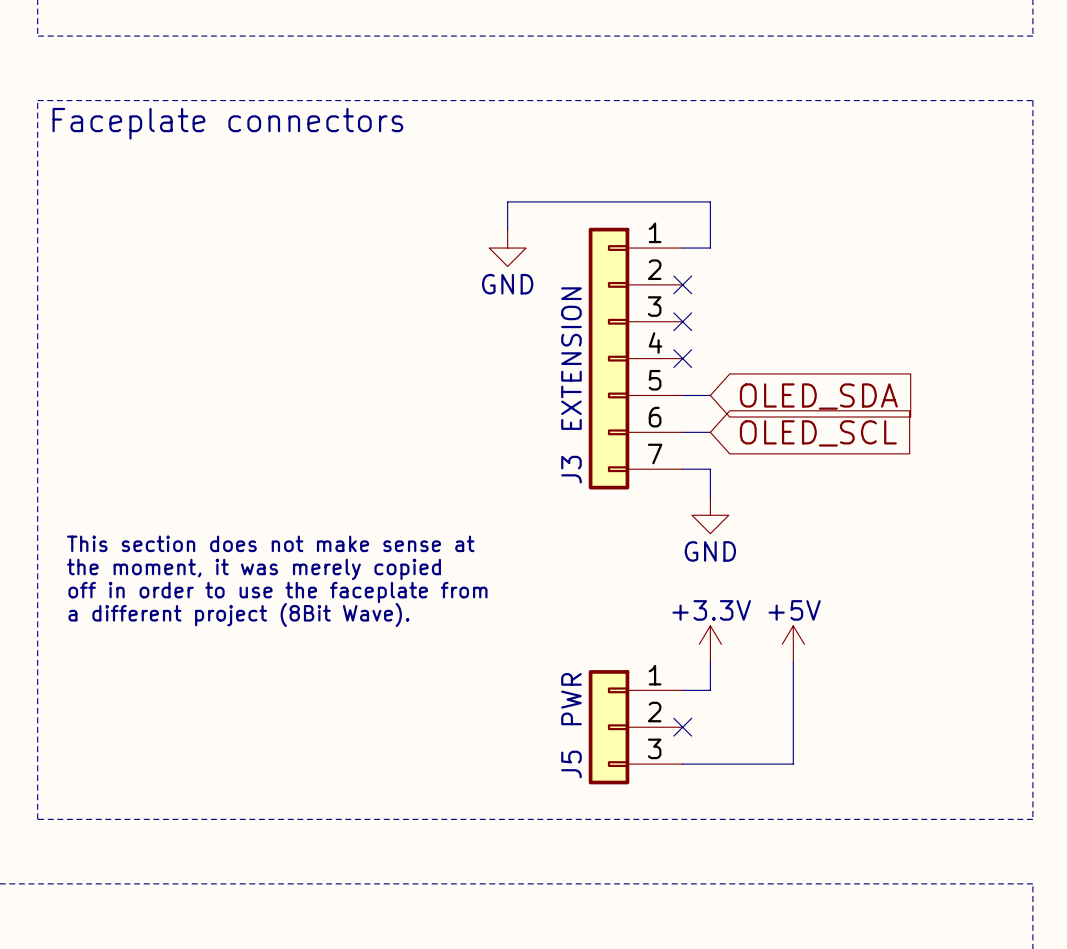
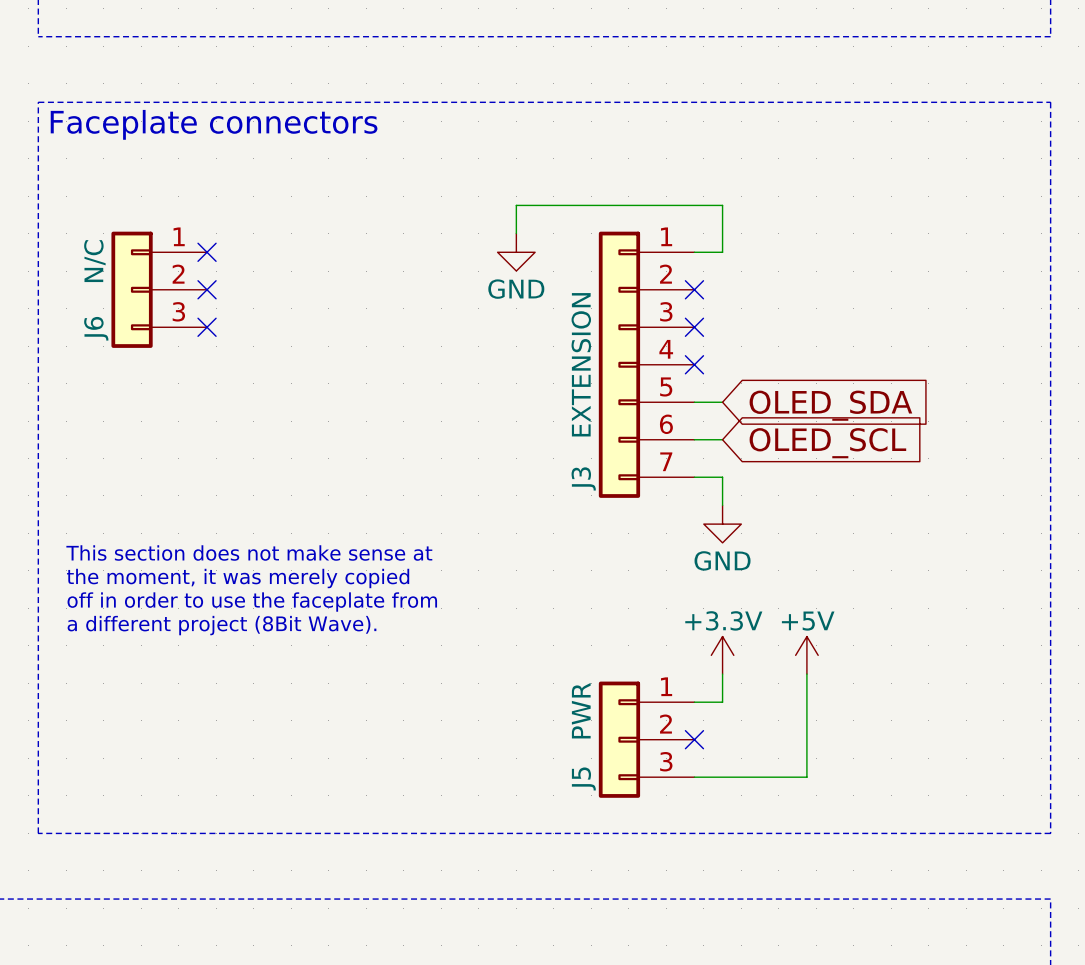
no-connect mark: none -> (207, 252)
J6: none -> N/C (159, 289)
no-connect mark: none -> (207, 289)
no-connect mark: none -> (207, 327)

